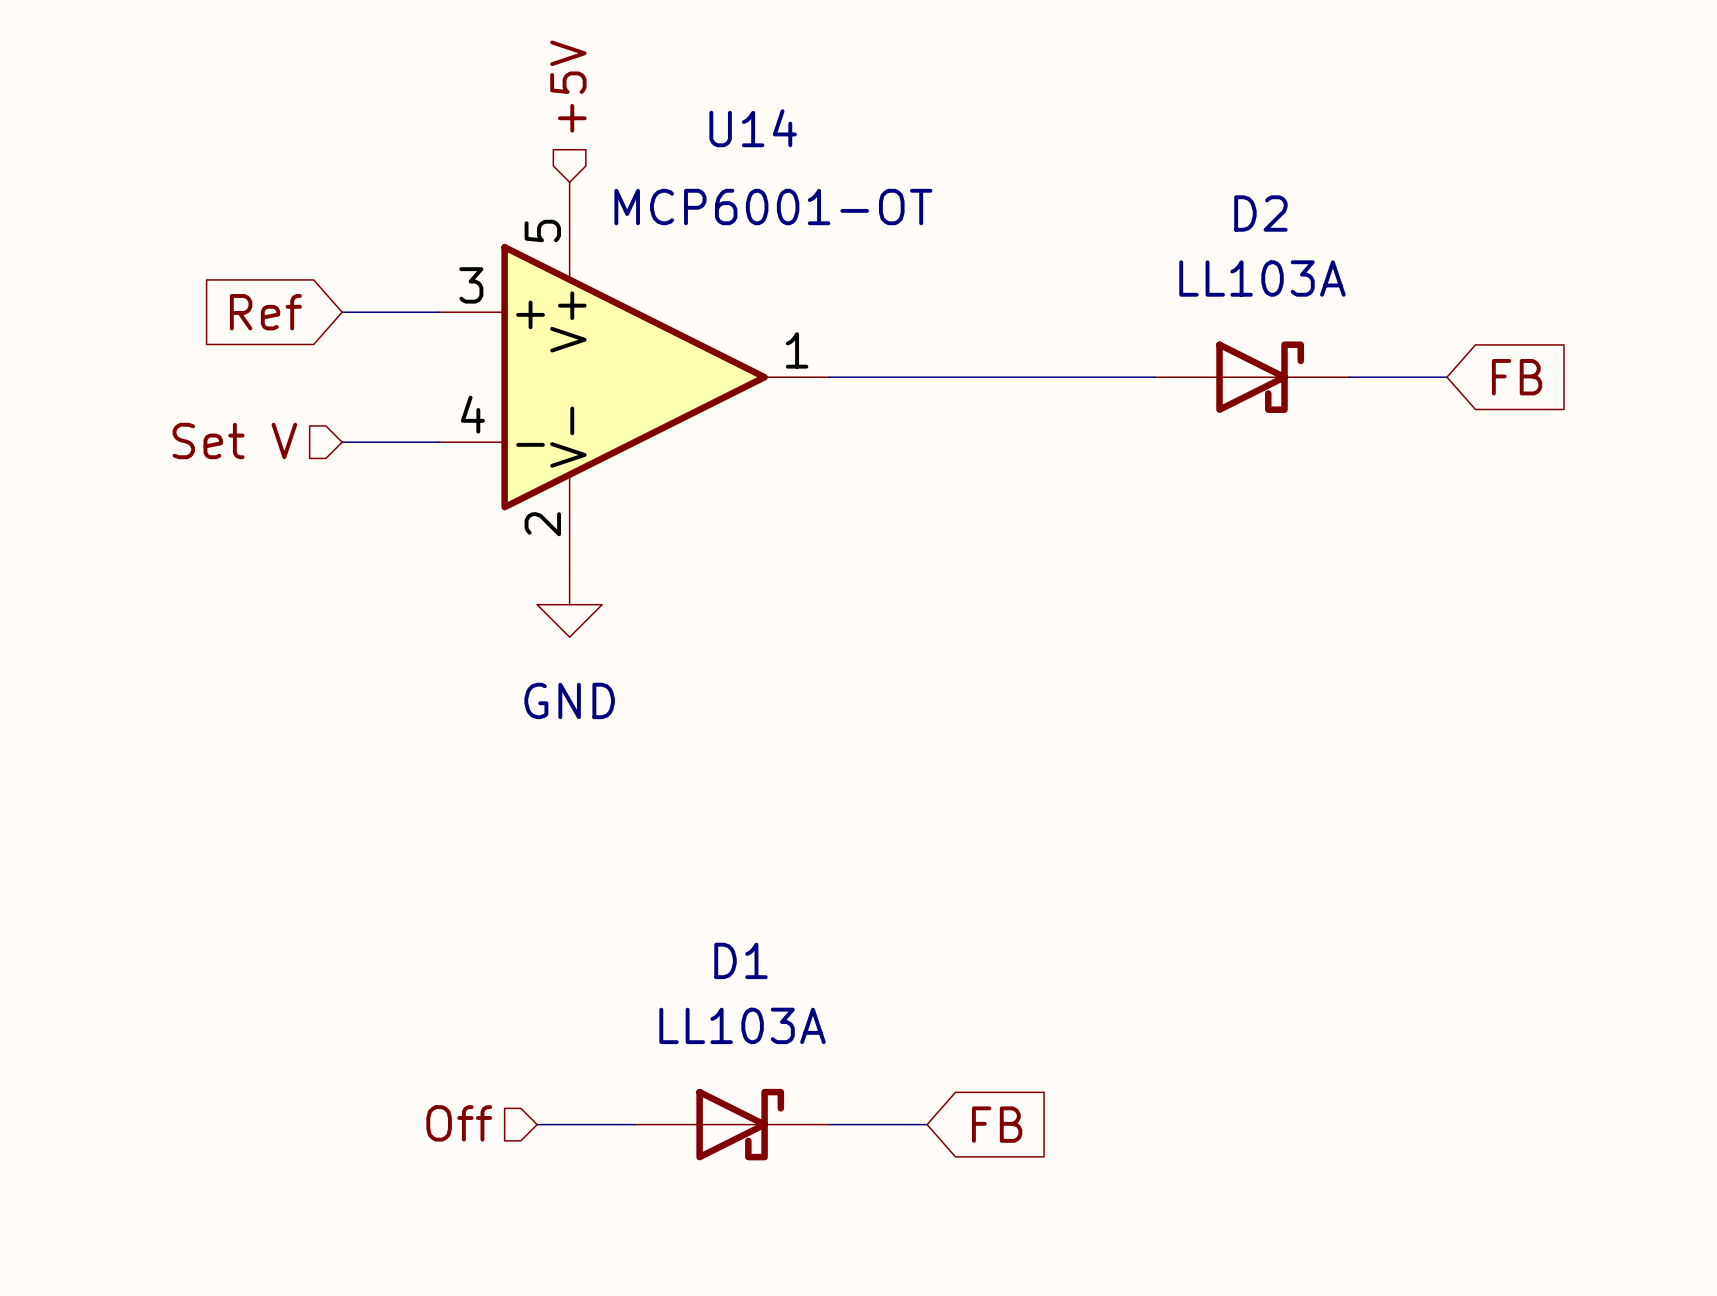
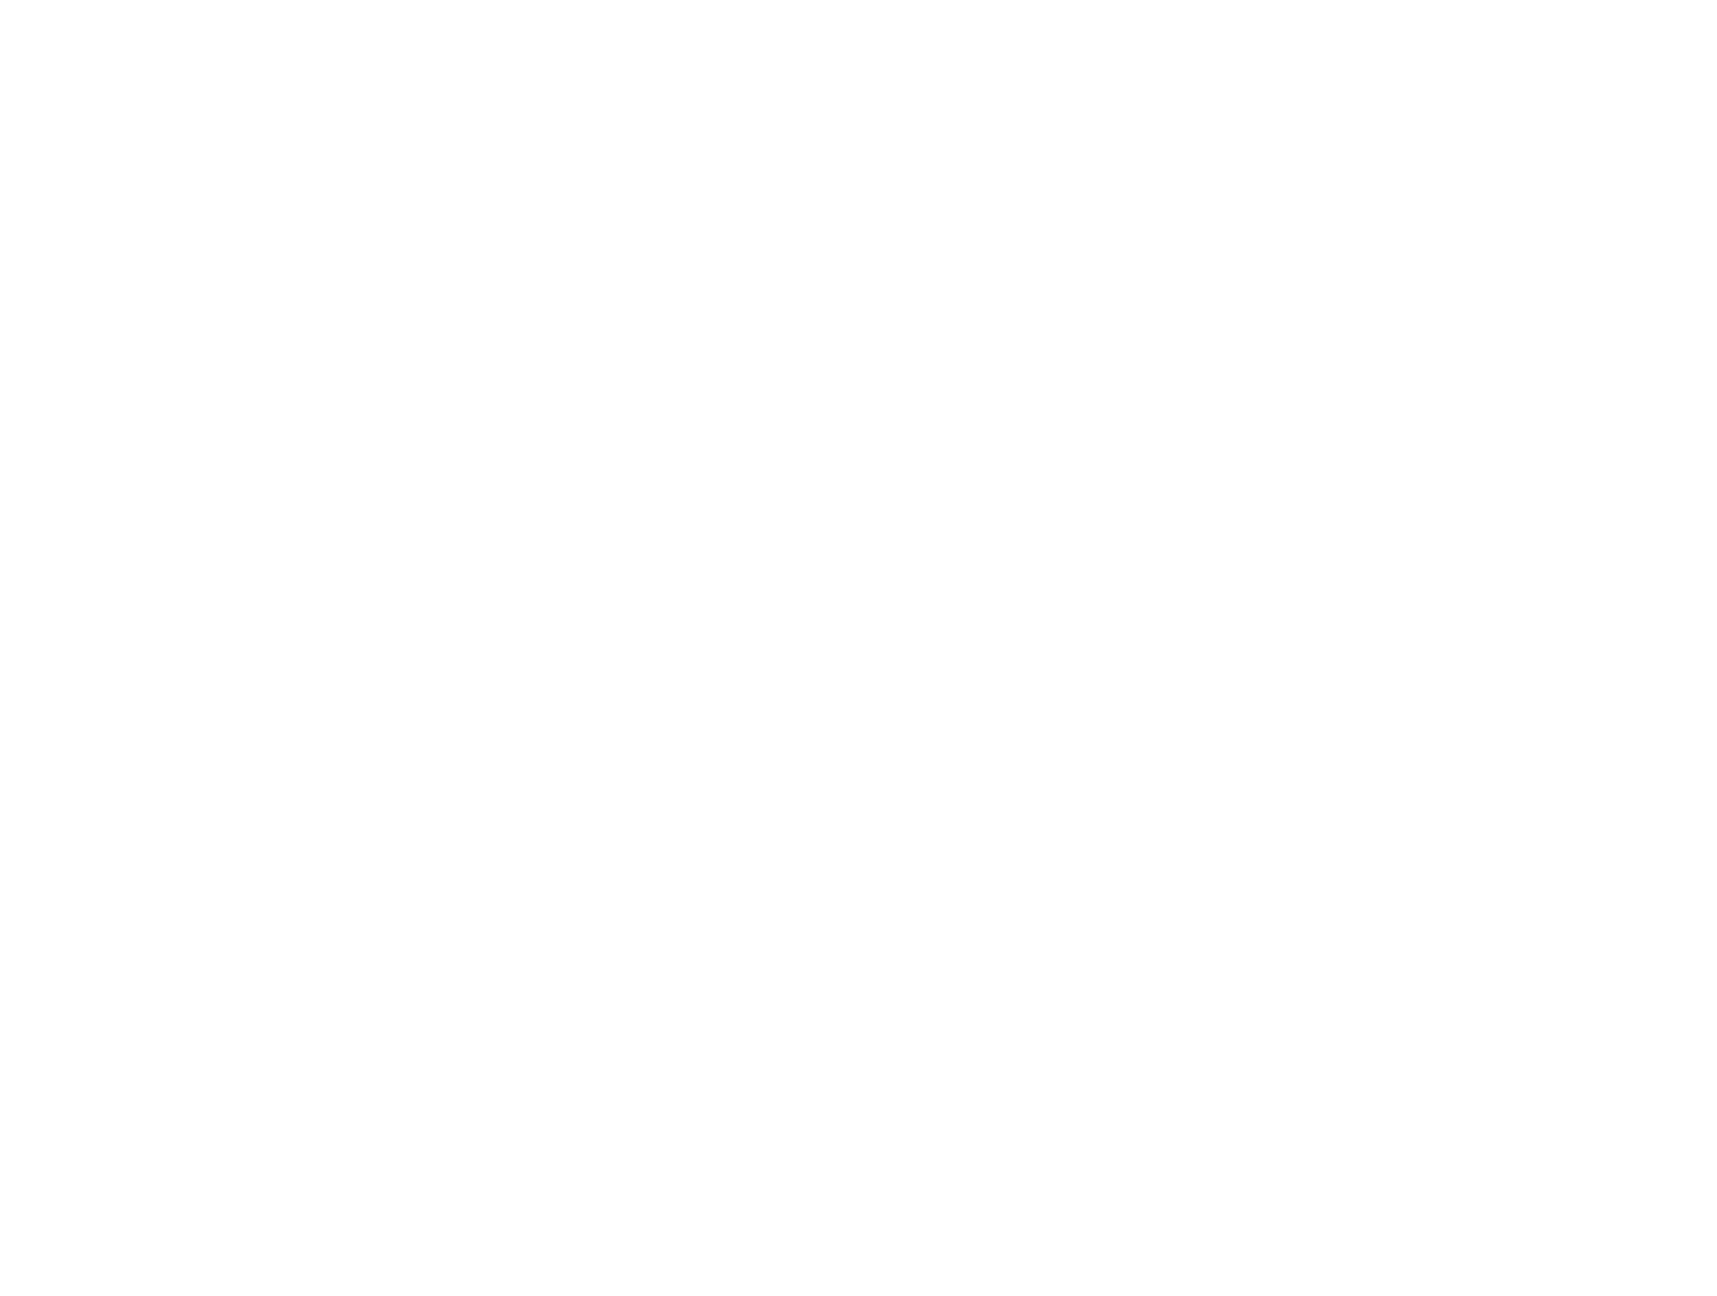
hierarchical label: +5V (568, 86) -> none
global label: Ref (265, 312) -> none
wire: (342, 312) (439, 312) -> none
U14: MCP6001-OT (634, 377) -> none
wire: (829, 377) (1154, 377) -> none
D2: LL103A (1252, 377) -> none
wire: (1349, 377) (1446, 377) -> none
global label: FB (1517, 377) -> none
hierarchical label: Set V (234, 440) -> none
wire: (342, 442) (439, 442) -> none
power symbol: GND (569, 604) -> none
hierarchical label: Off (459, 1123) -> none
wire: (537, 1124) (634, 1124) -> none
D1: LL103A (732, 1124) -> none
wire: (829, 1124) (927, 1124) -> none
global label: FB (997, 1124) -> none

